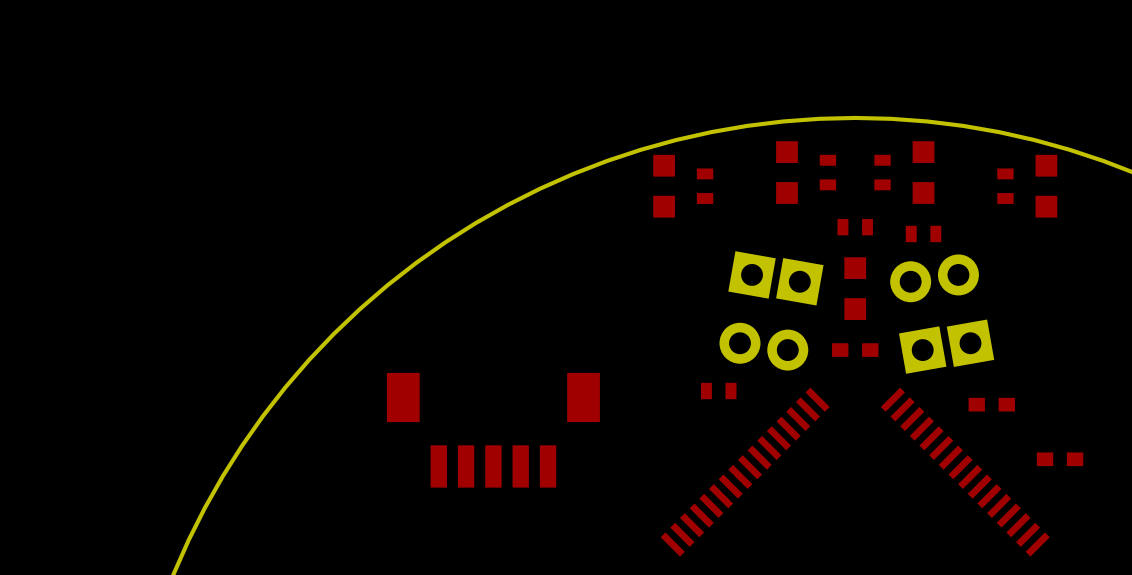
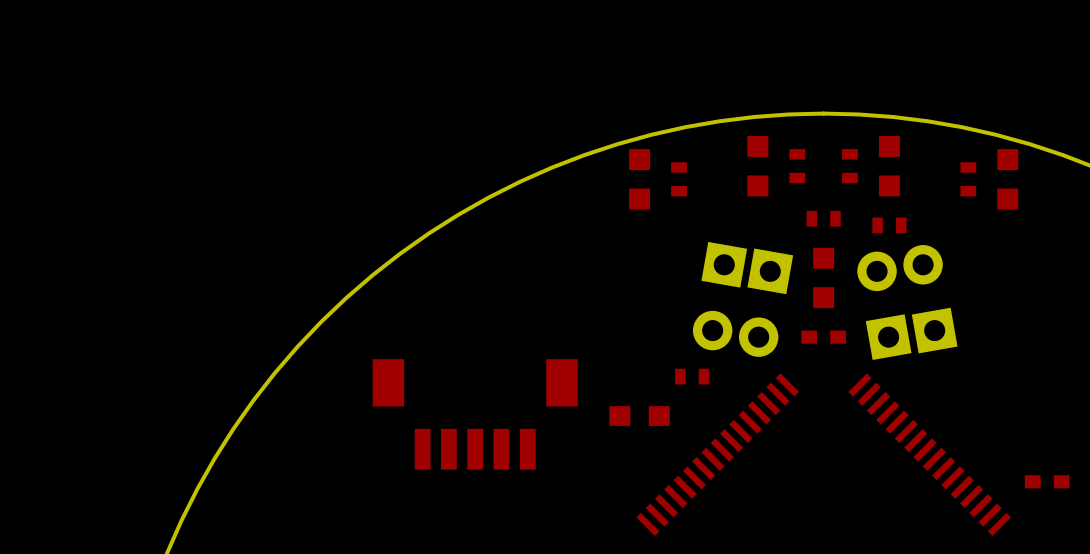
part: (991, 404) -> none
part: none -> (639, 416)
part position: (1060, 459) -> (1047, 481)

